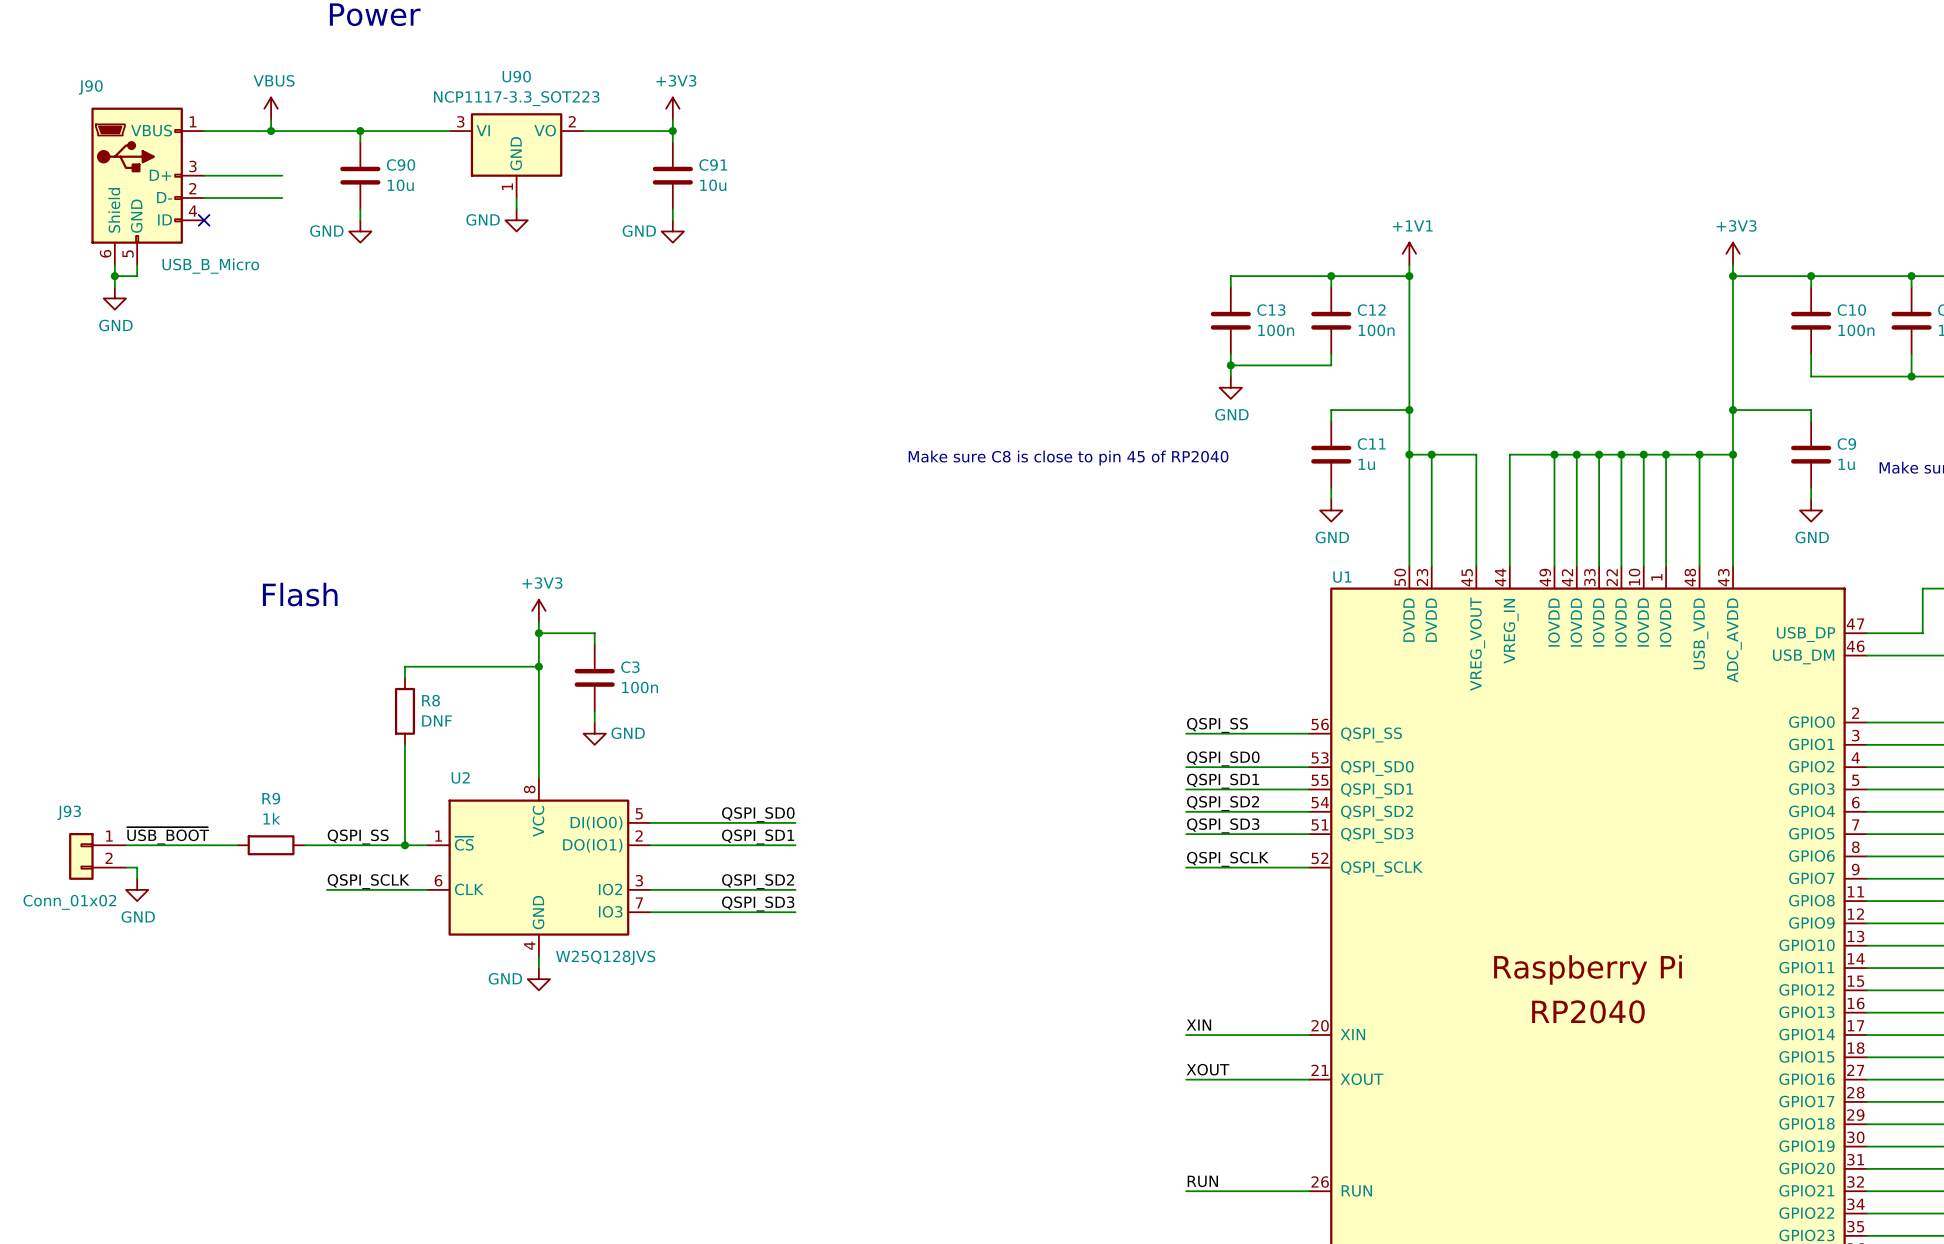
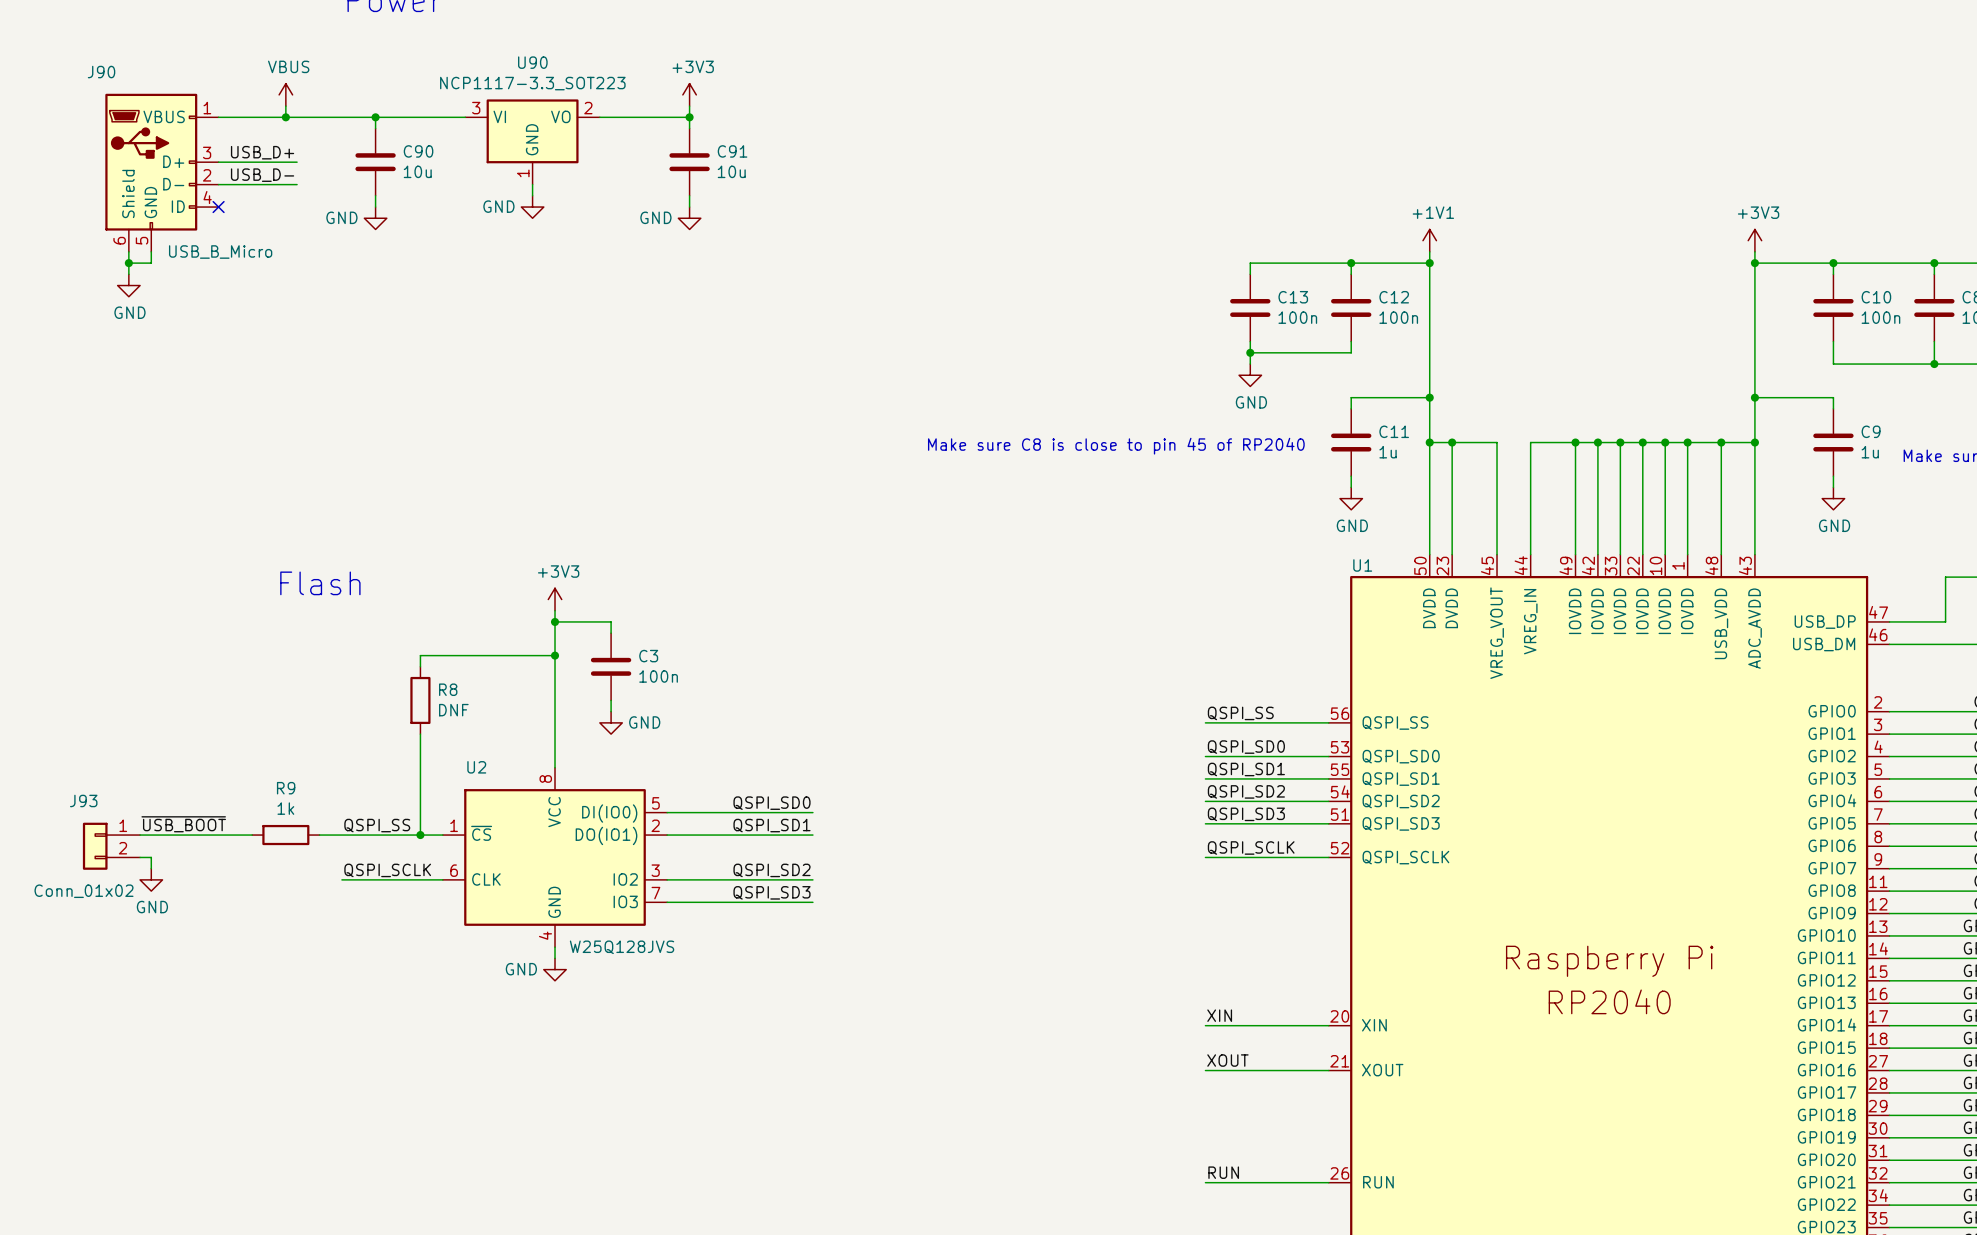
label: none -> USB_D+ (262, 152)
label: none -> USB_D- (262, 175)

